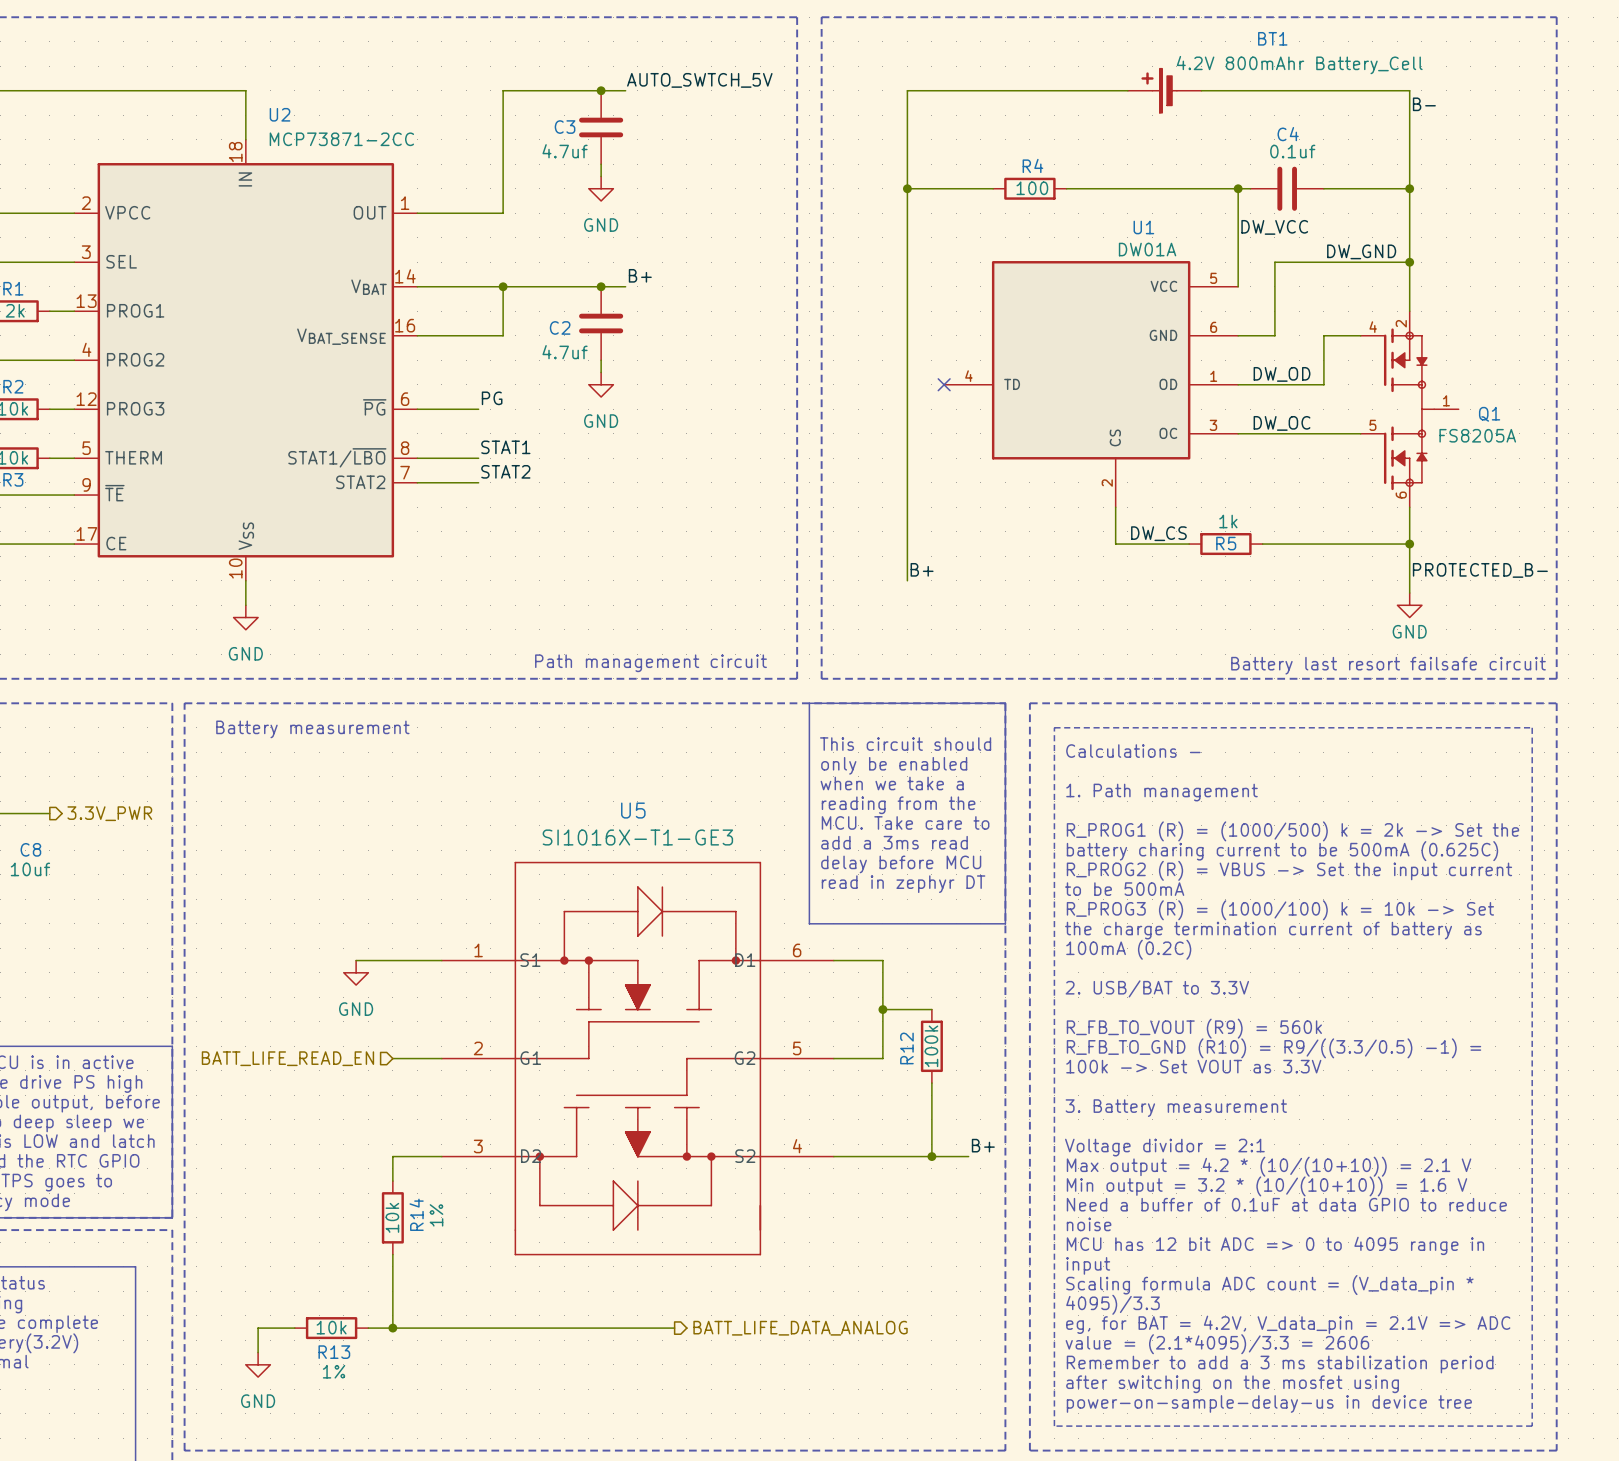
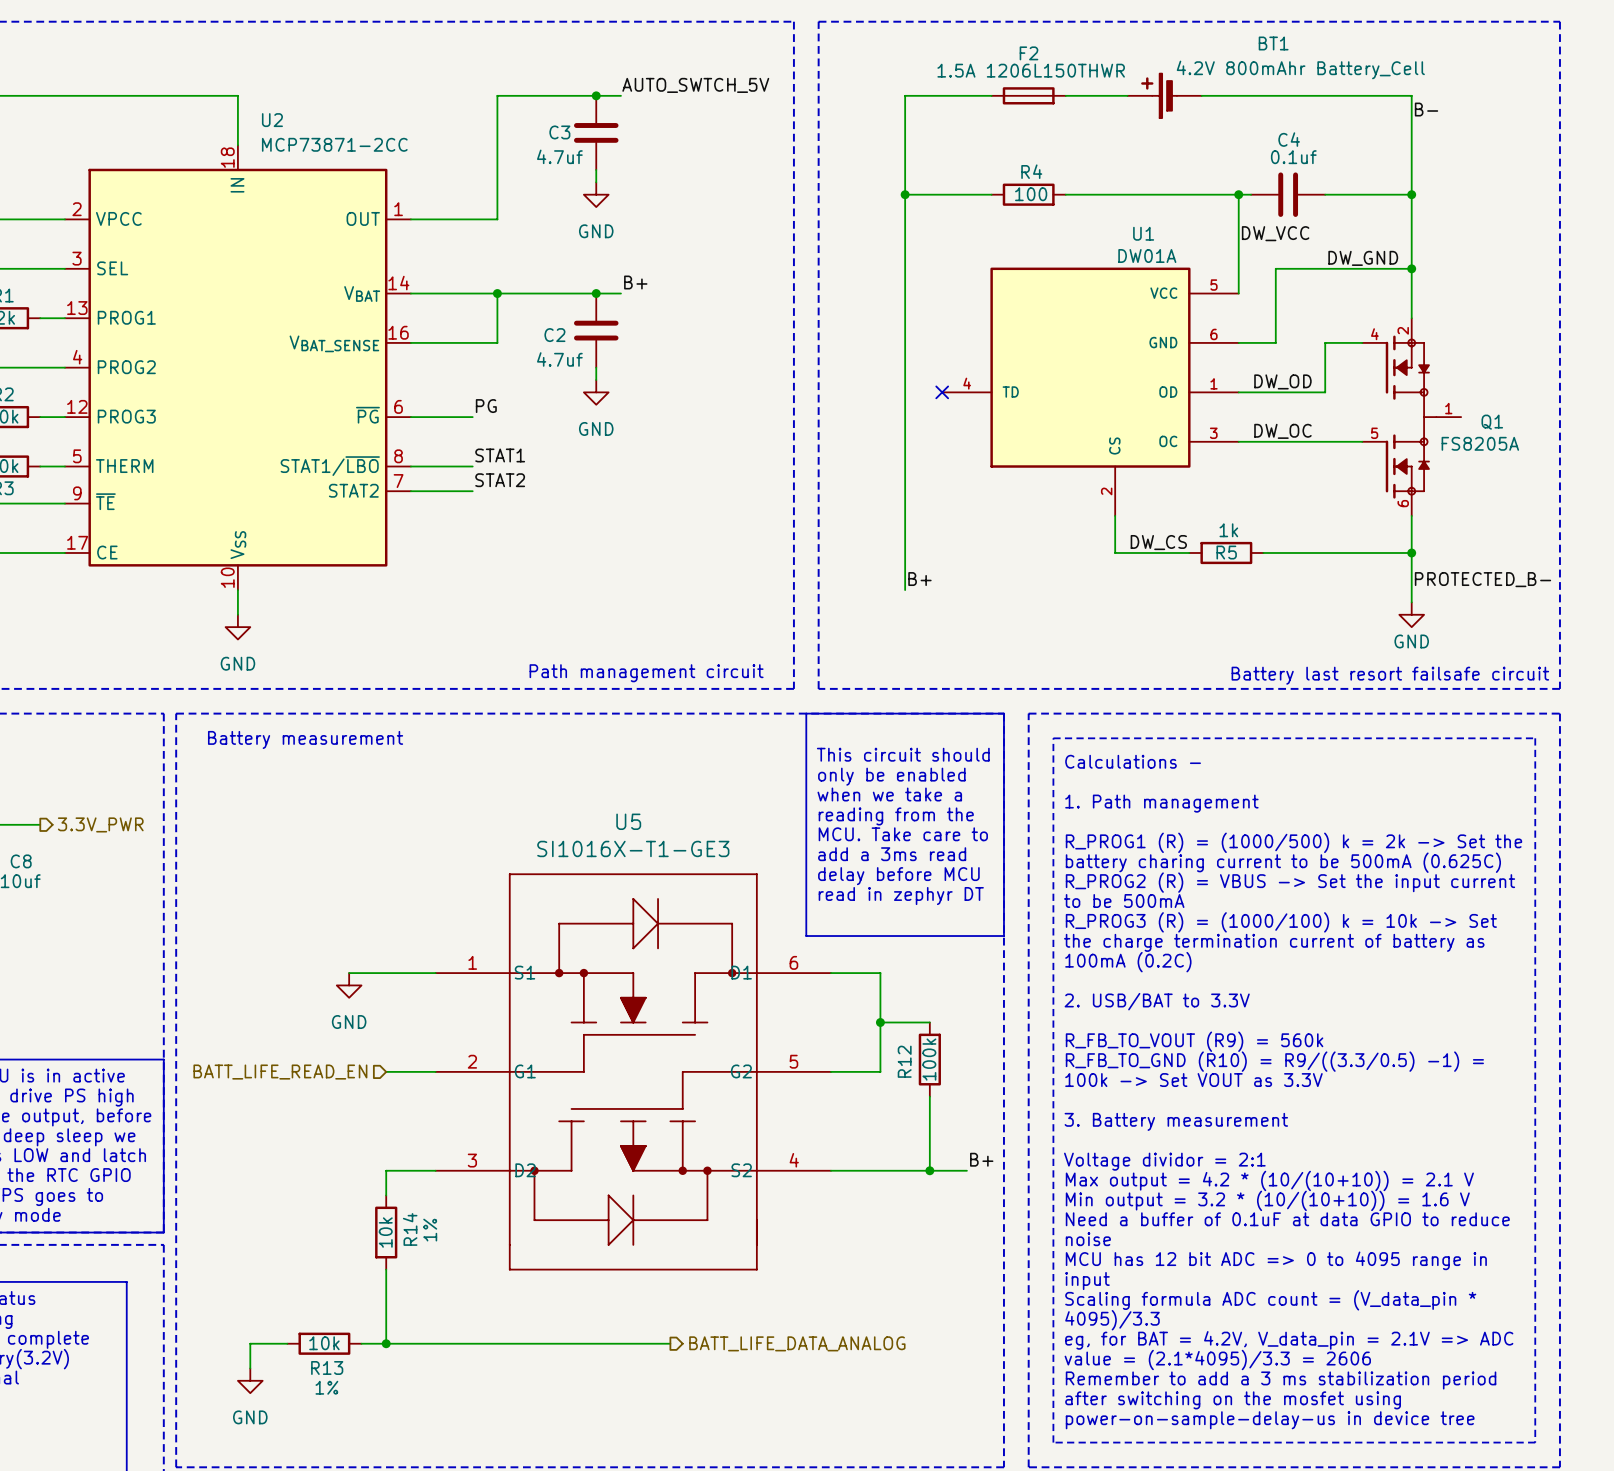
F2: none -> 1.5A 1206L150THWR (1028, 95)

